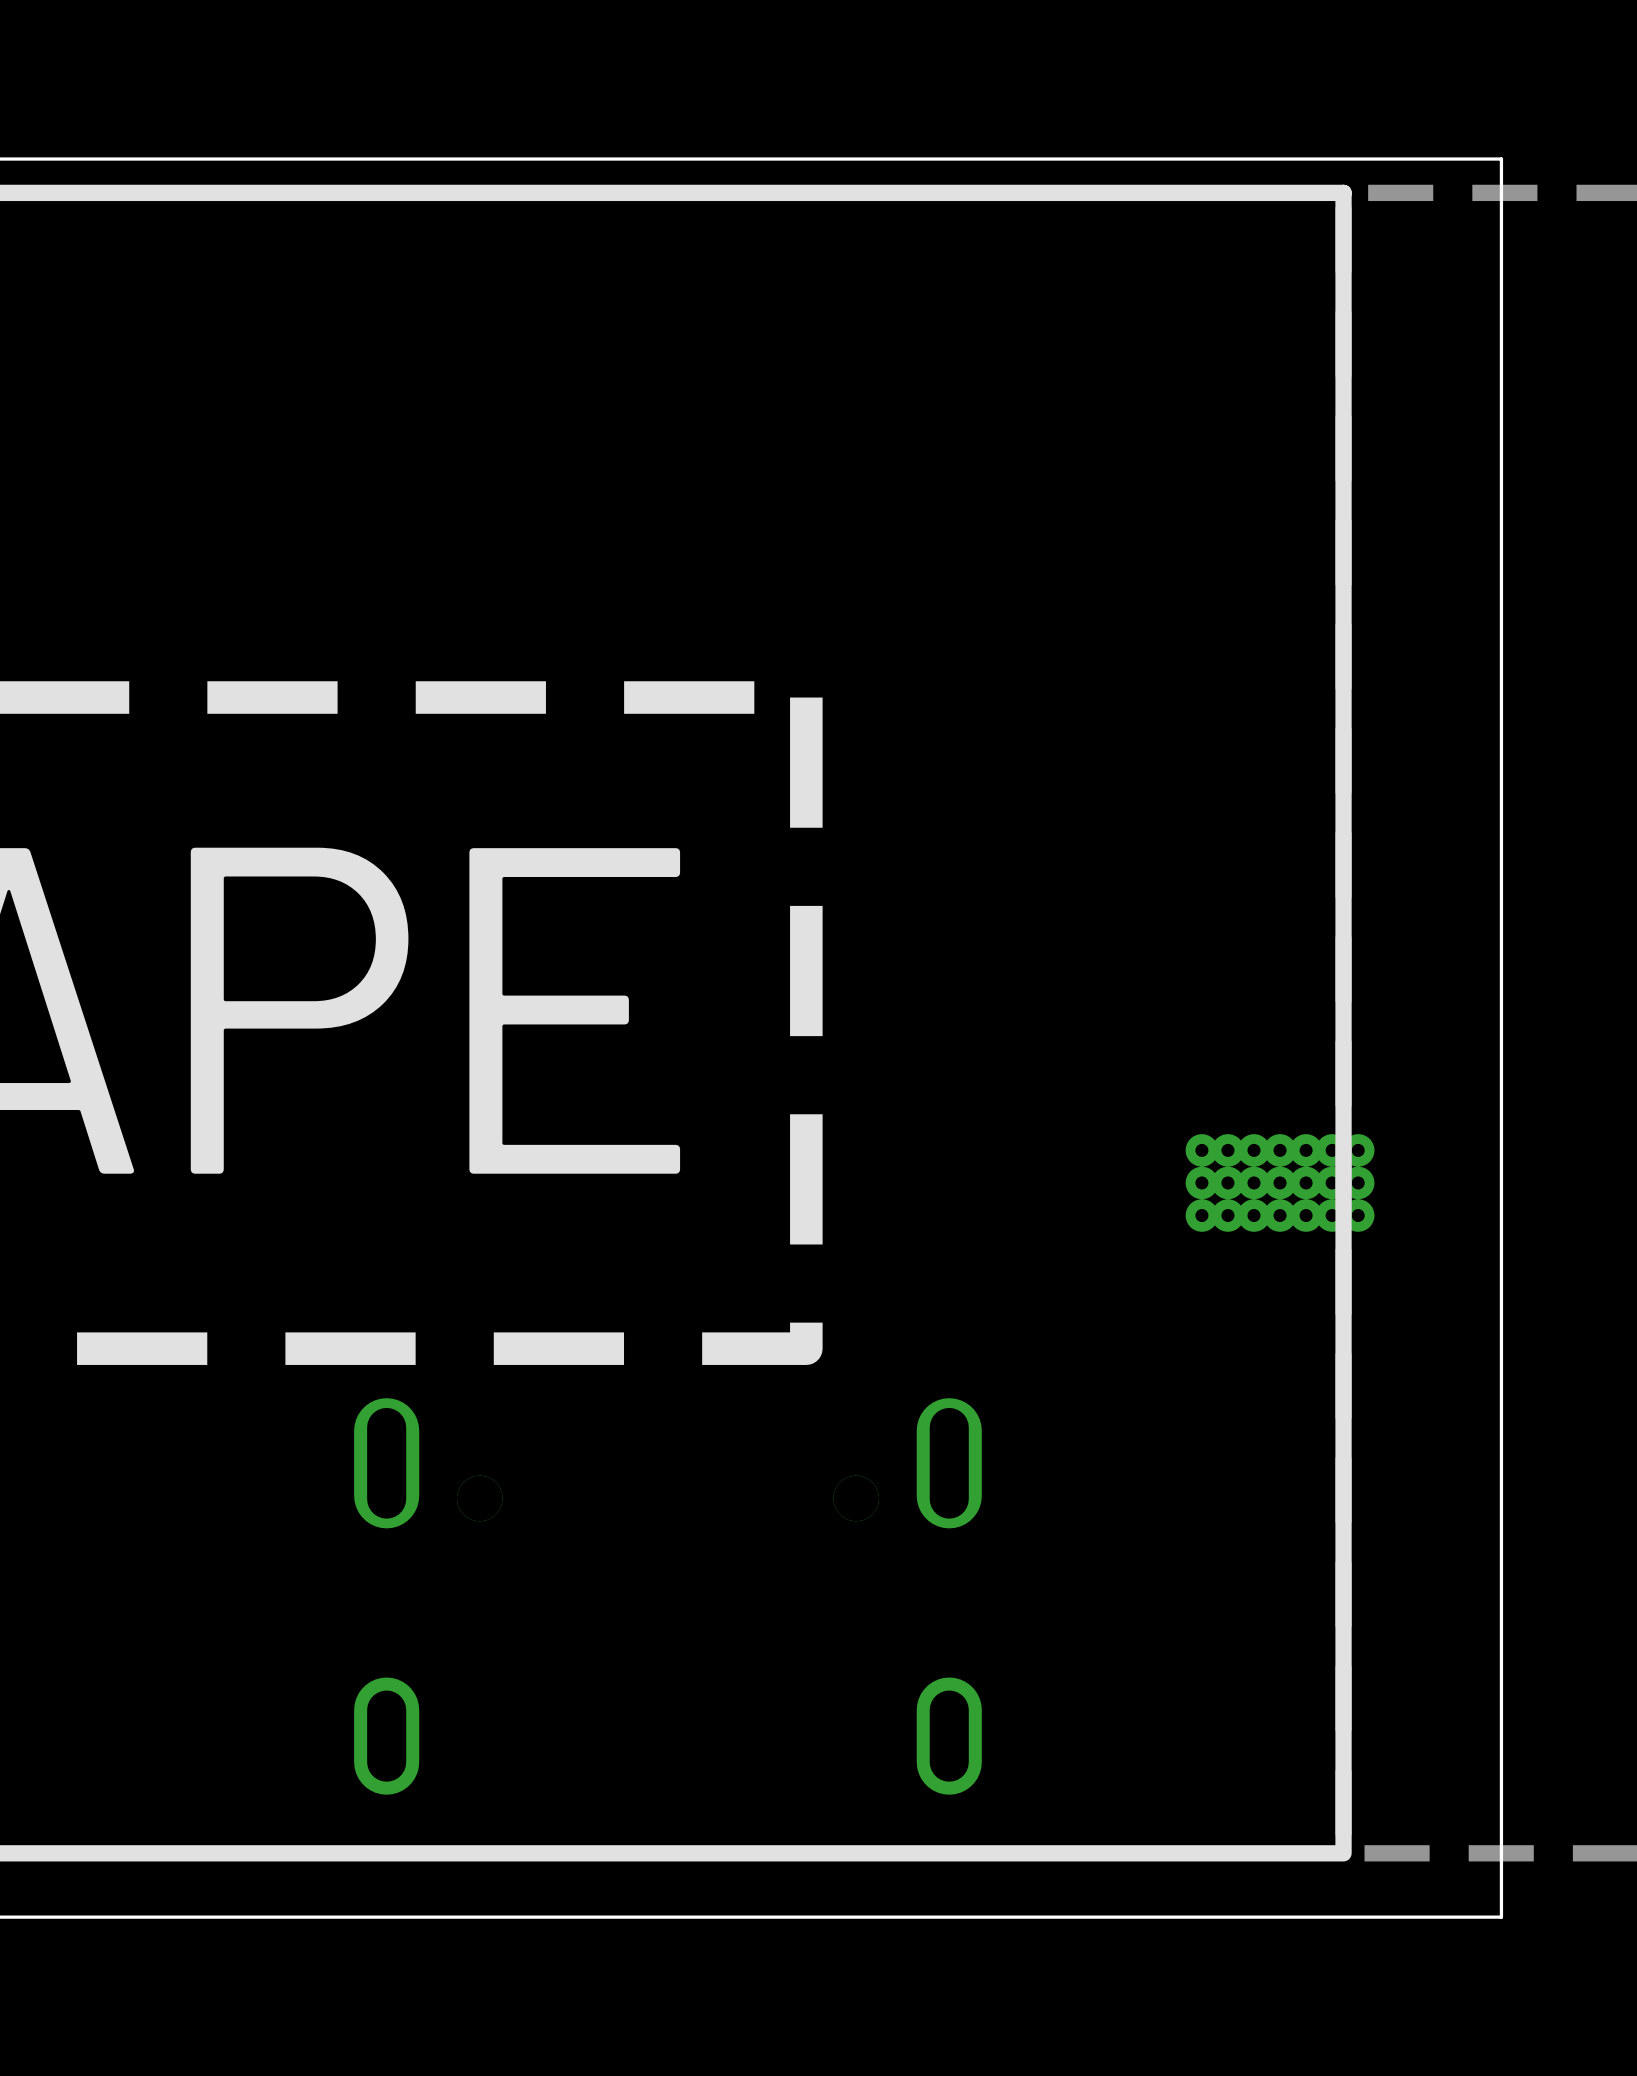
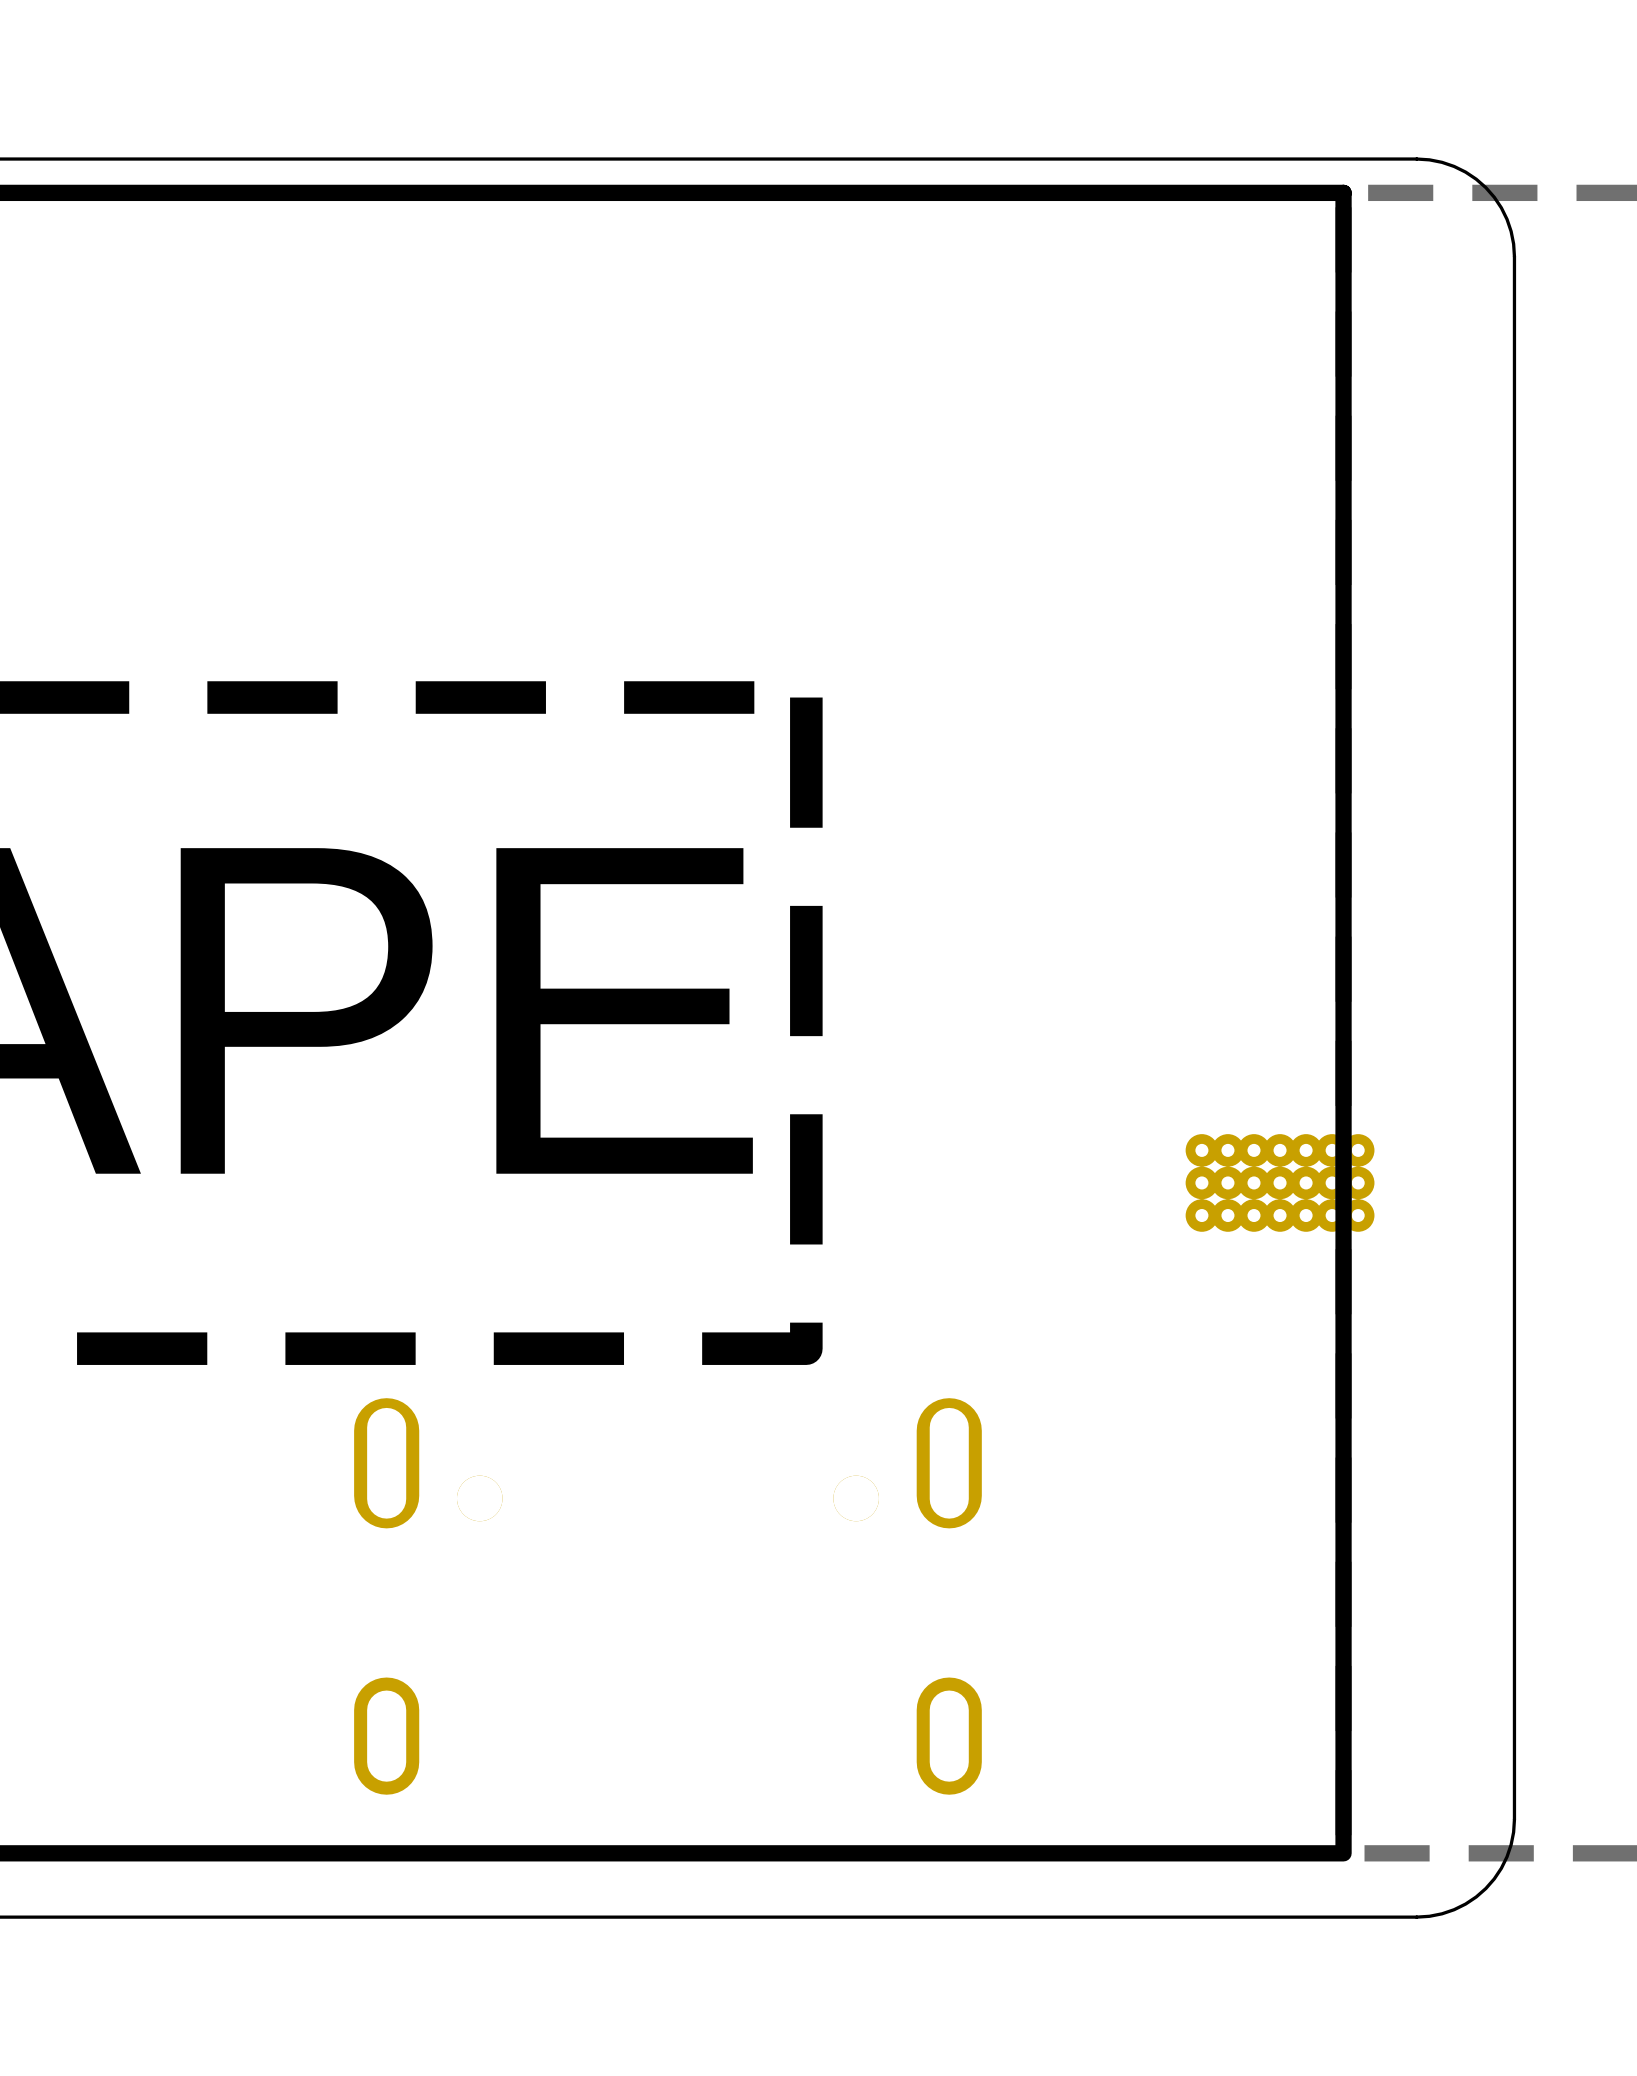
board edge: (1416, 159) (1501, 159) (1501, 1917) (1416, 1917) -> (1416, 159) (1442, 162) (1454, 166) (1476, 179) (1485, 187) (1501, 207) (1507, 219) (1511, 231) (1514, 256) (1514, 1819) (1513, 1832) (1507, 1856) (1494, 1878) (1485, 1888) (1476, 1896) (1454, 1909) (1429, 1916) (1416, 1917)

